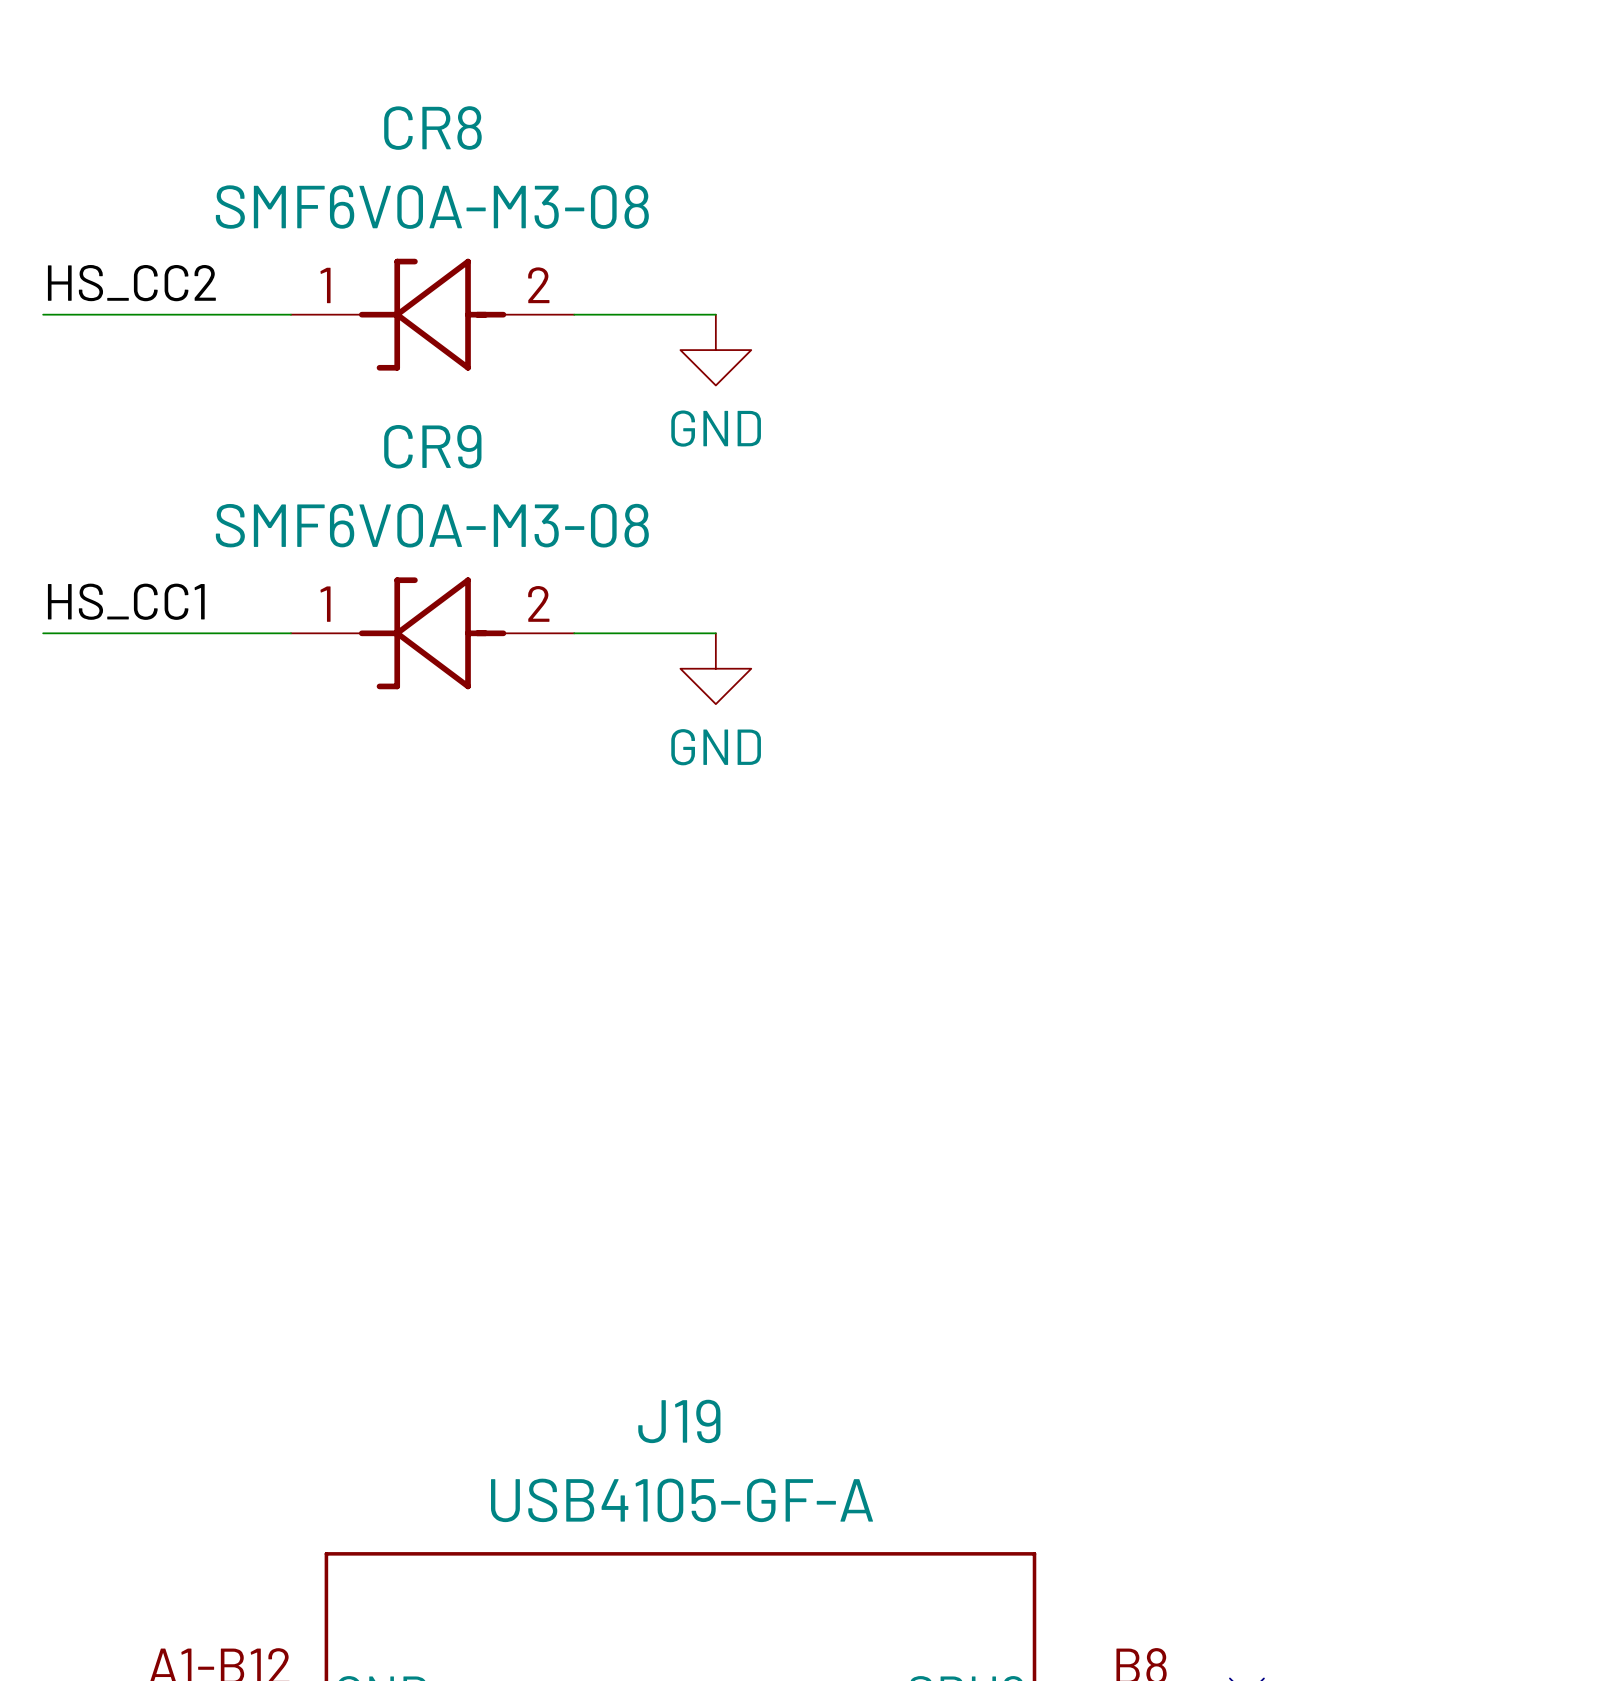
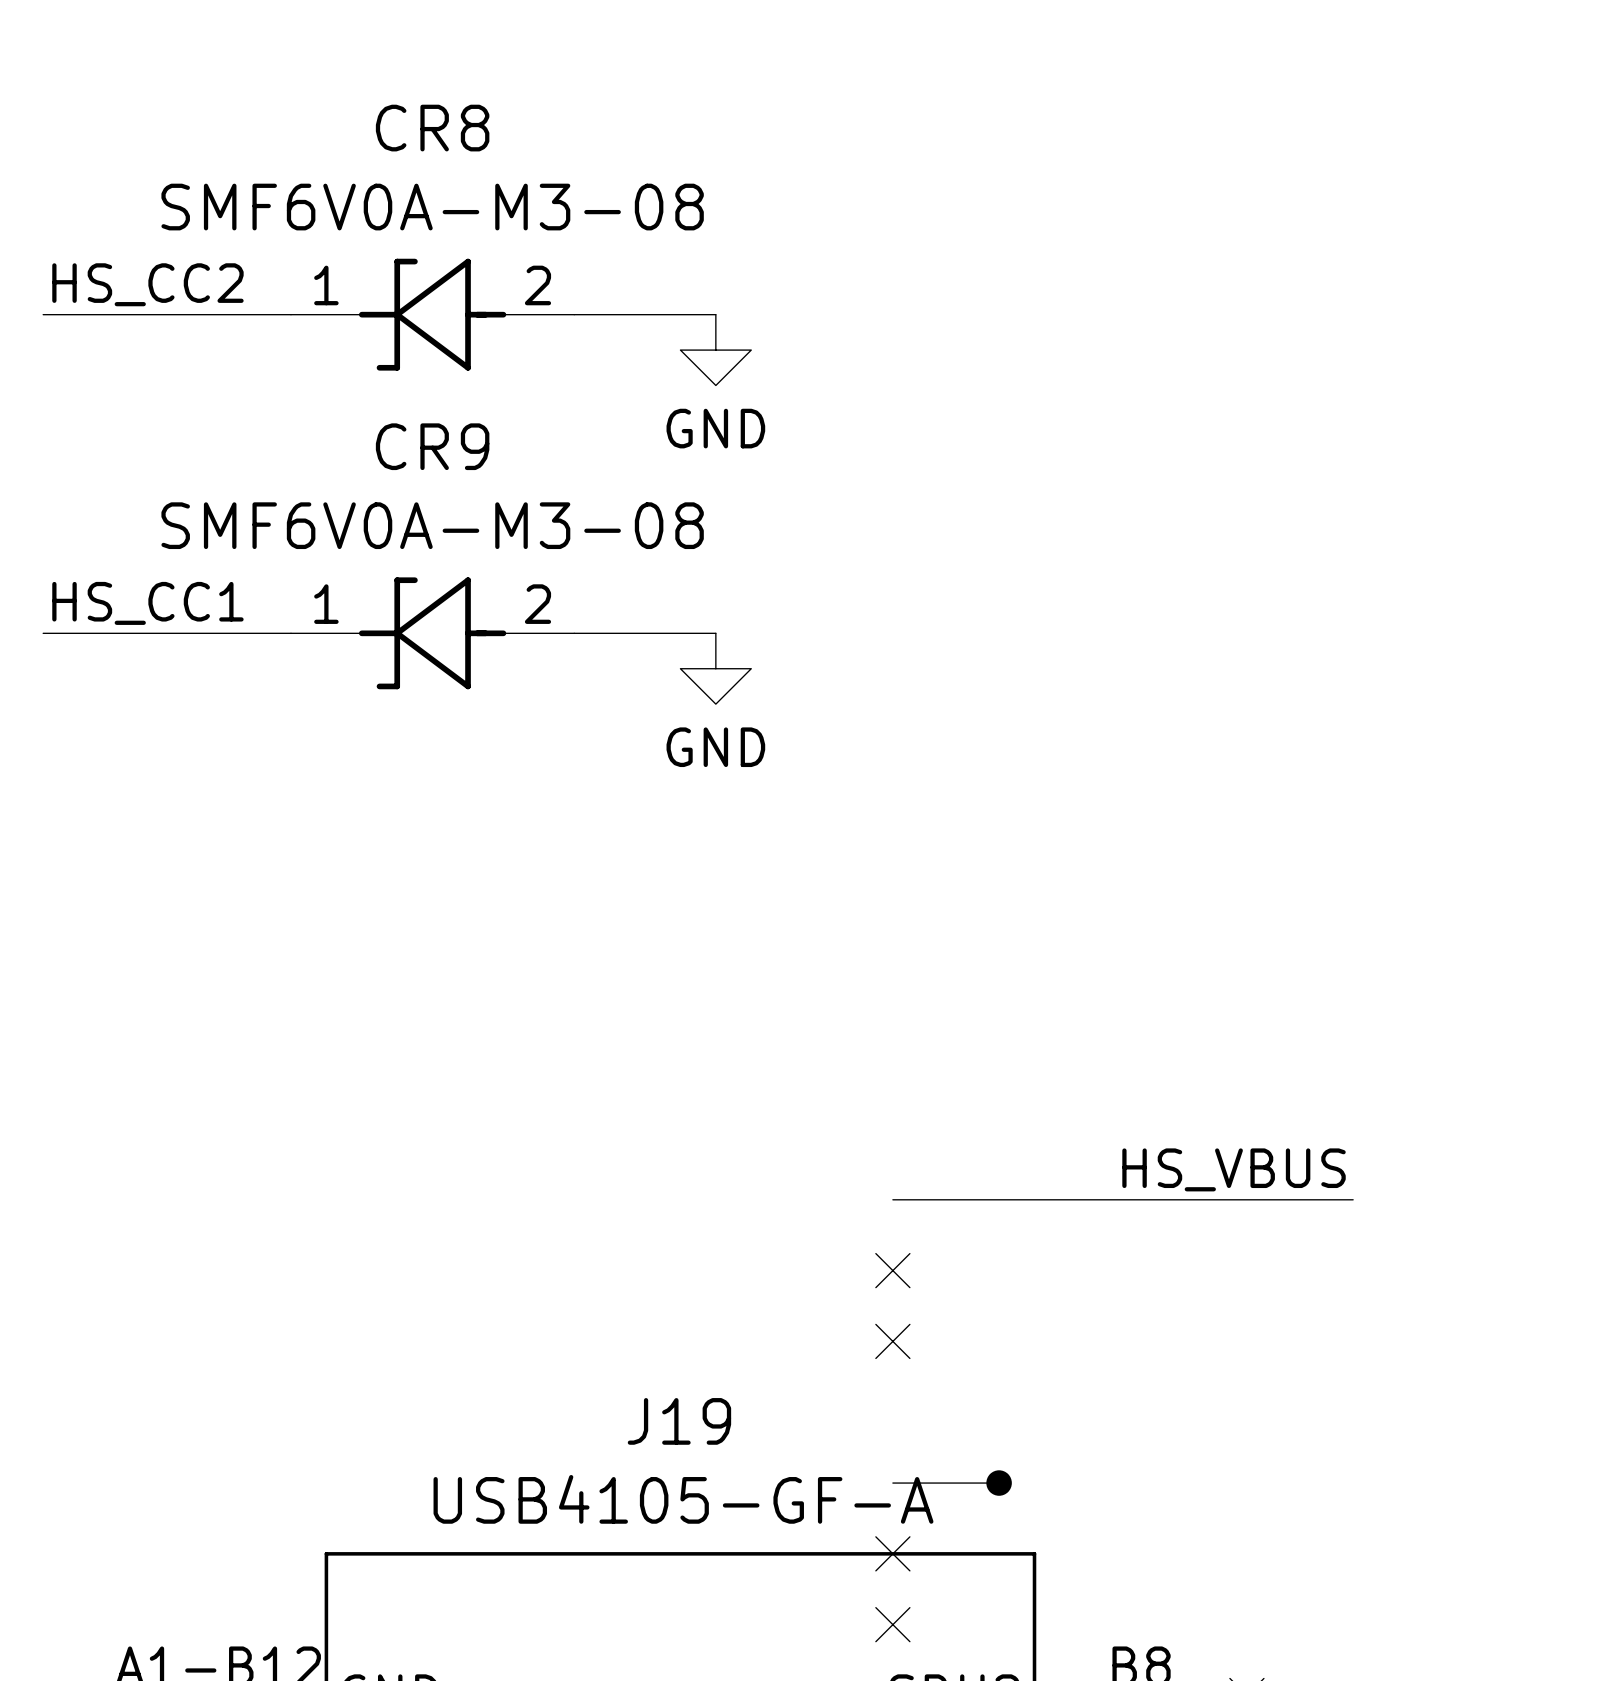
label: none -> HS_VBUS (1234, 1169)
wire: none -> (892, 1199) (1353, 1199)
no-connect mark: none -> (892, 1270)
no-connect mark: none -> (892, 1341)
wire: none -> (892, 1483) (999, 1483)
junction: none -> (999, 1483)
no-connect mark: none -> (892, 1553)
no-connect mark: none -> (892, 1624)

